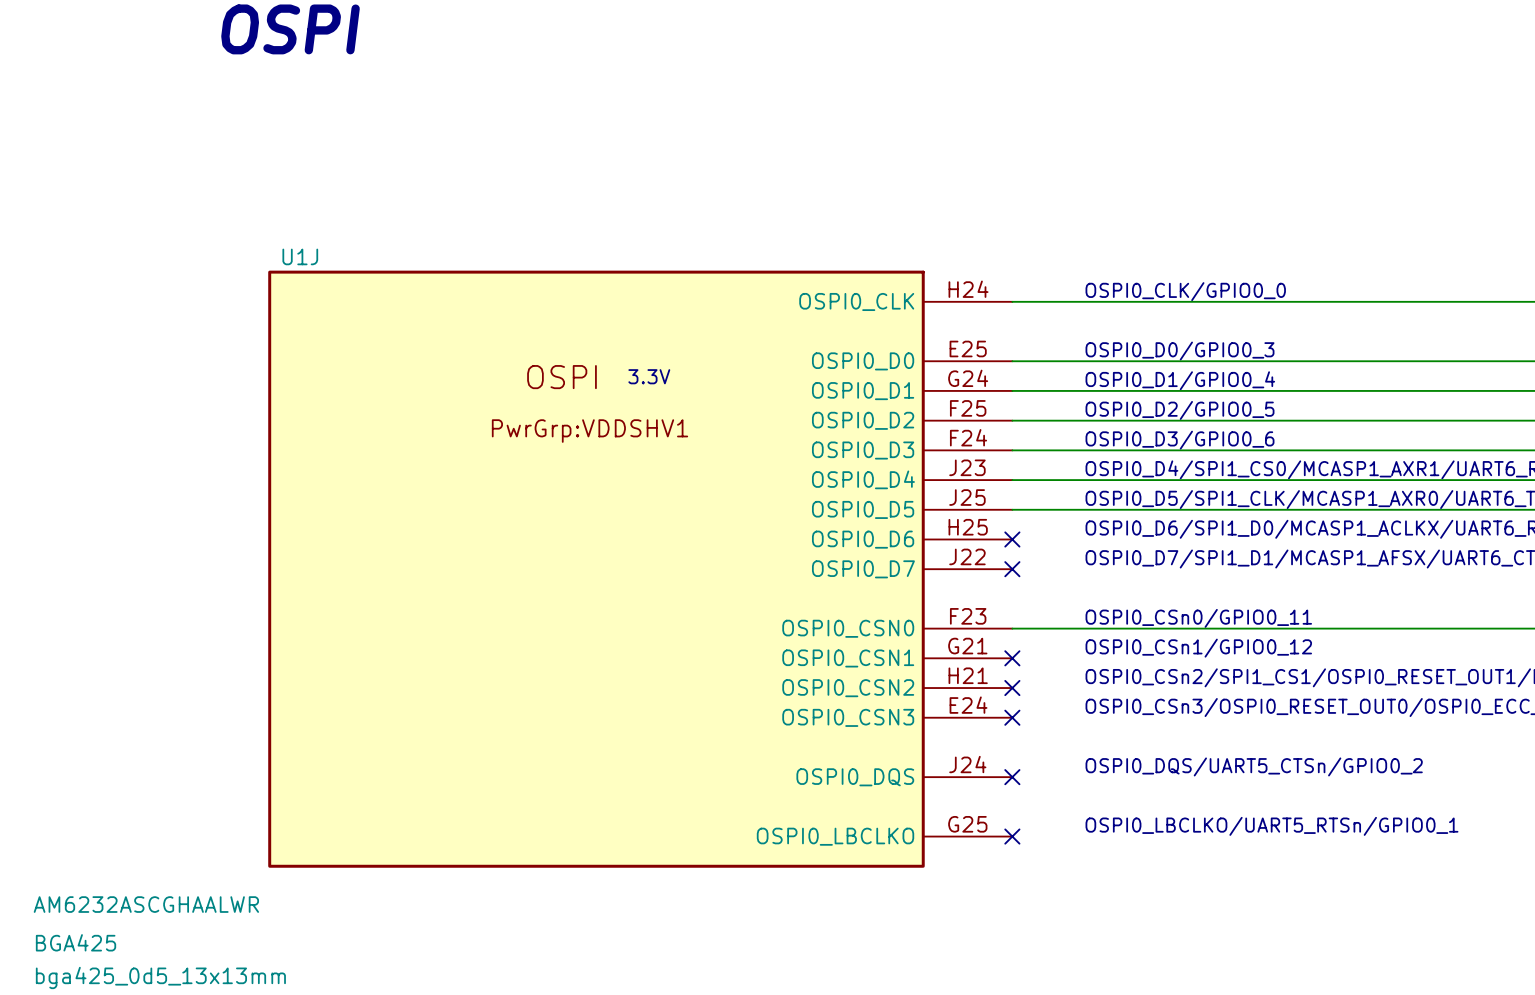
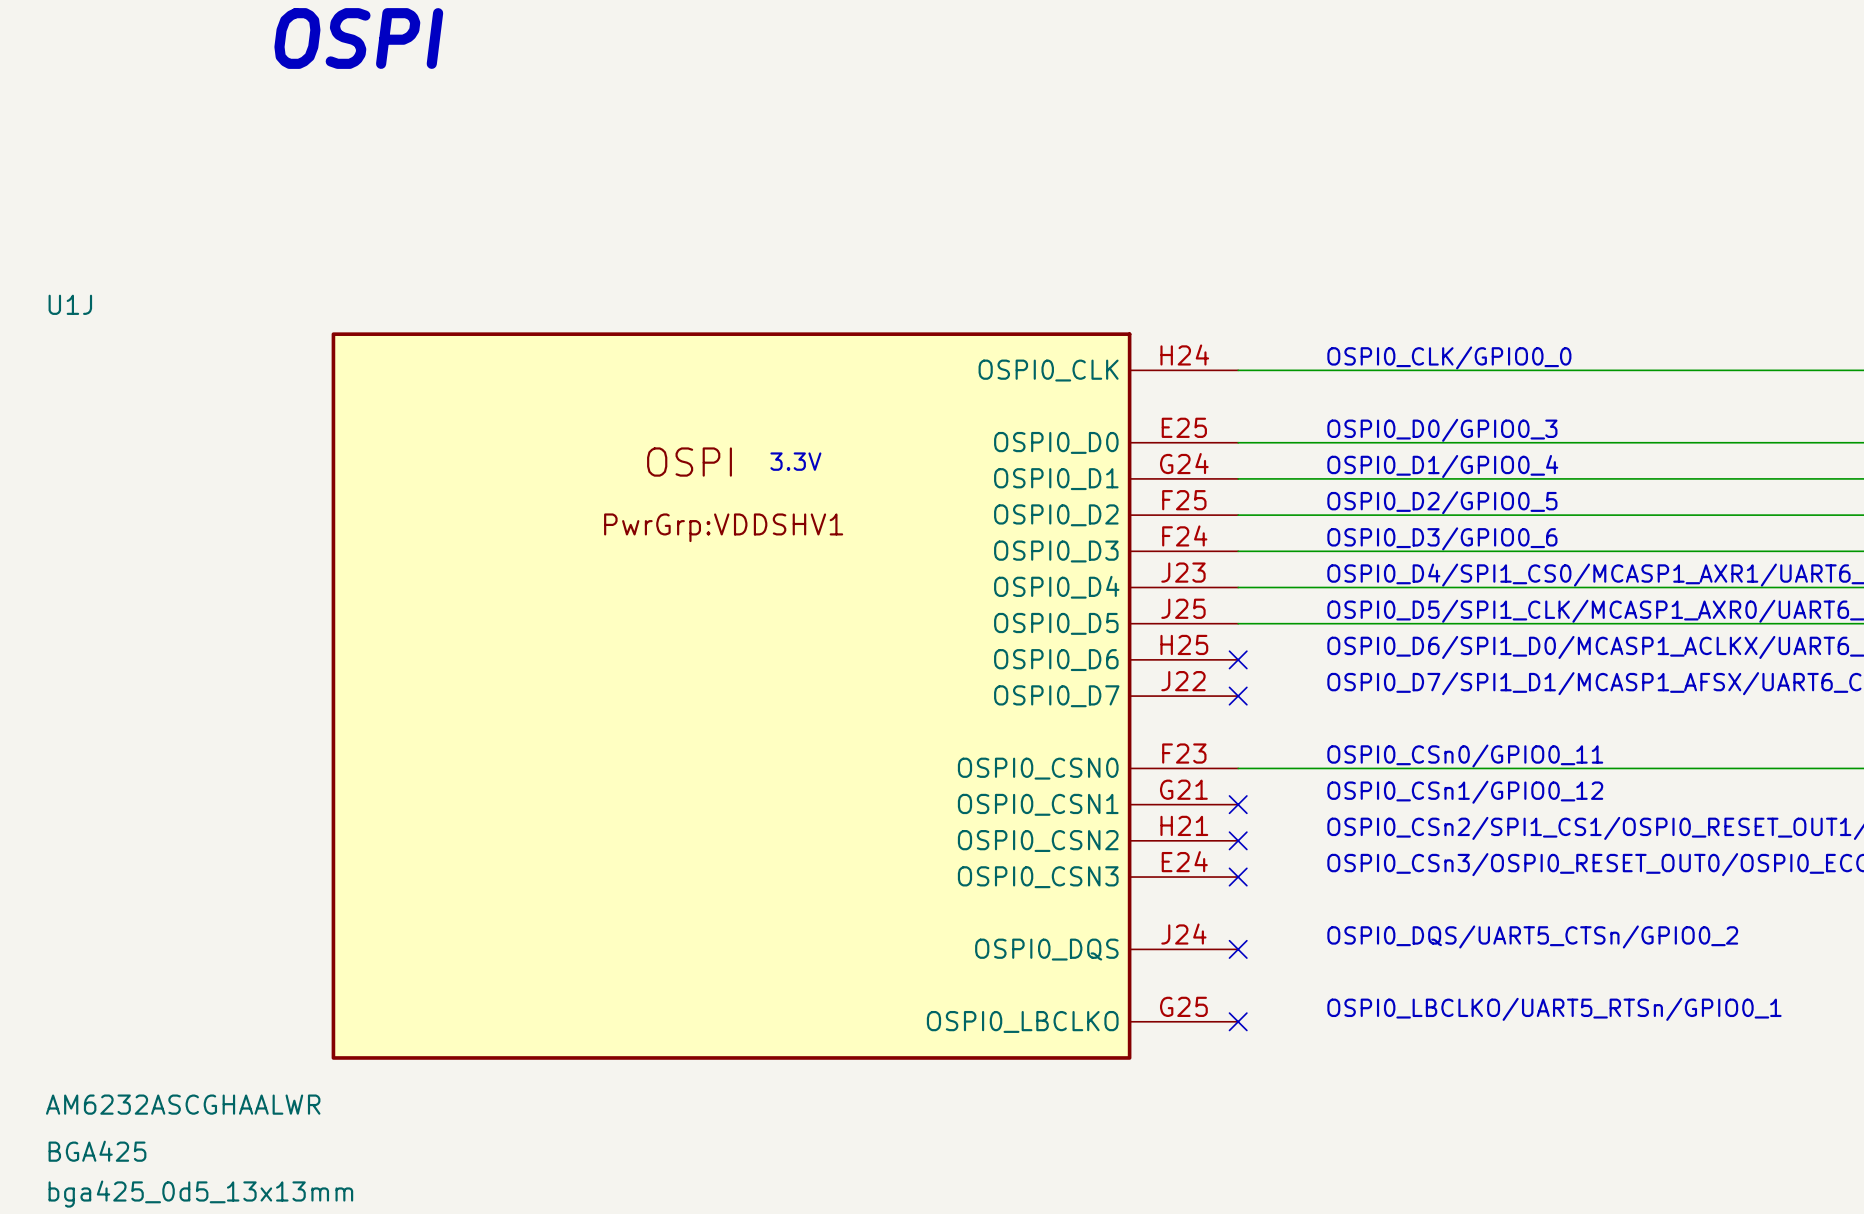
U1J name position: U1J (300, 256) -> U1J (70, 304)

